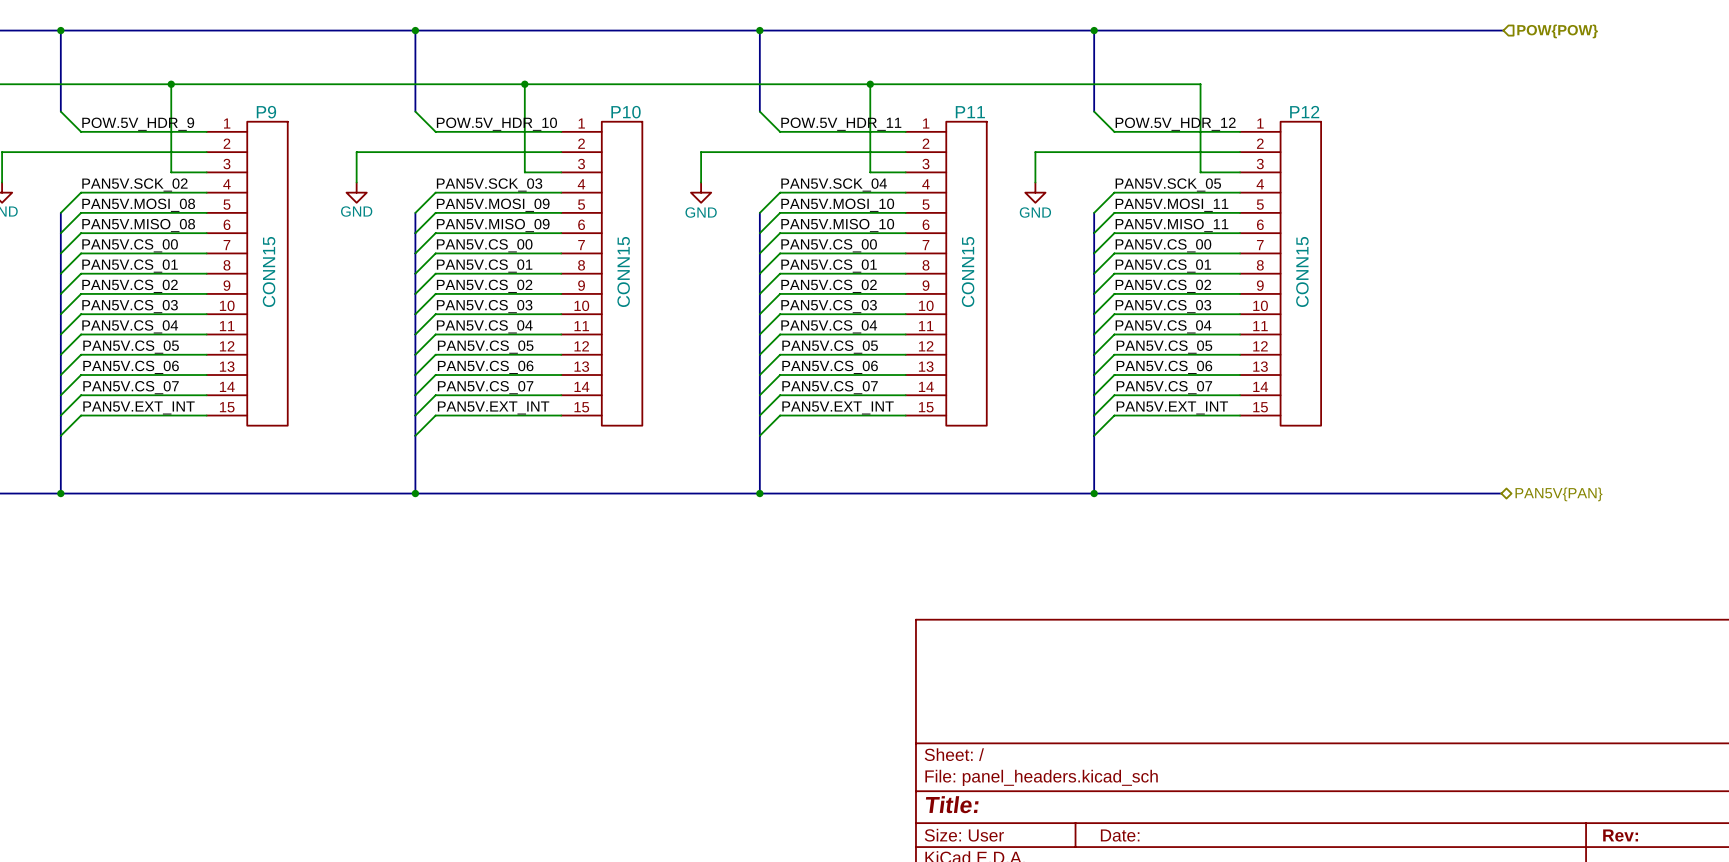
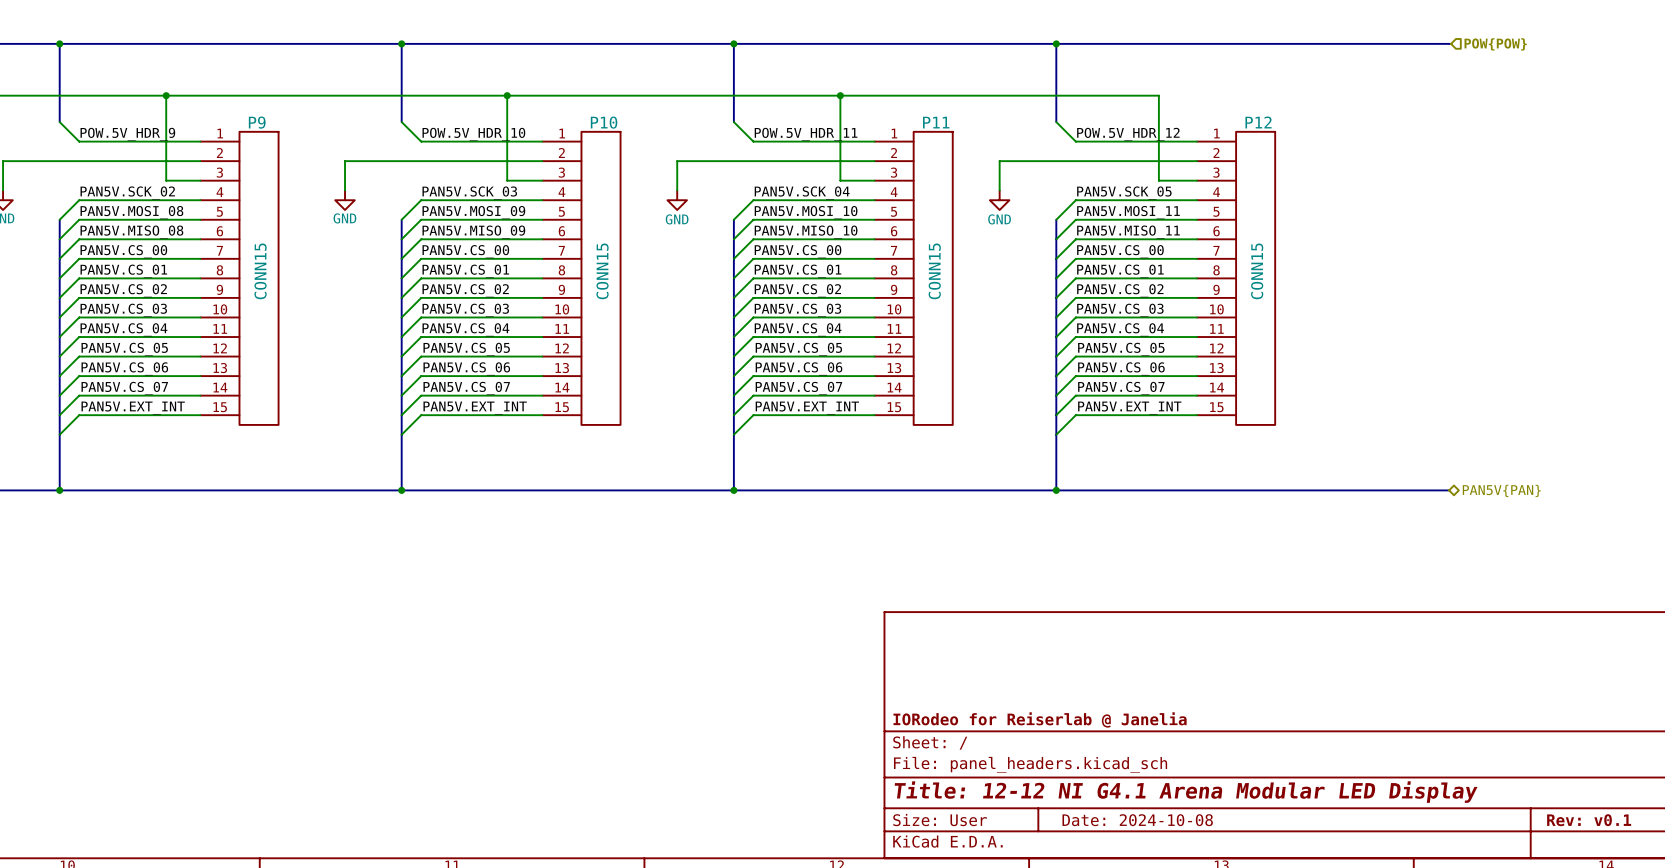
title block: none -> IORodeo for Reiserlab @ Janelia (1040, 719)
title block: Title: (952, 804) -> Title: 12-12 NI G4.1 Arena Modular LED Display (1186, 792)
title block: Date: (1120, 835) -> Date: 2024-10-08 (1137, 820)
title block: Rev: (1620, 835) -> Rev: v0.1 (1589, 820)

